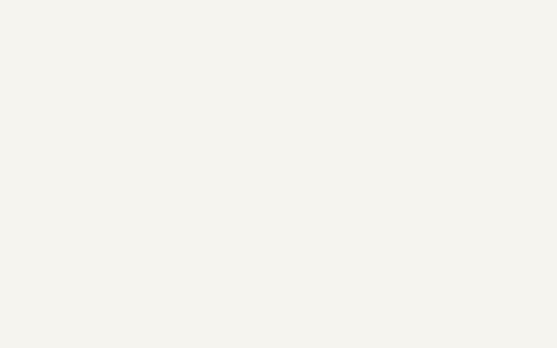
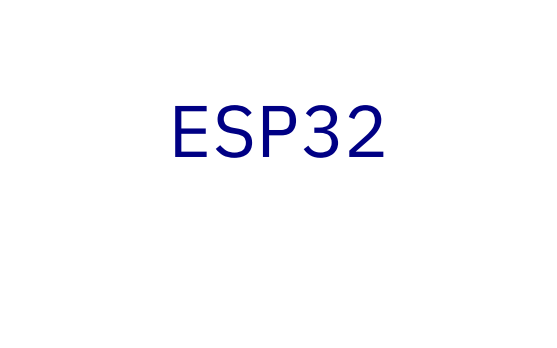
text: none -> ESP32 (279, 131)

